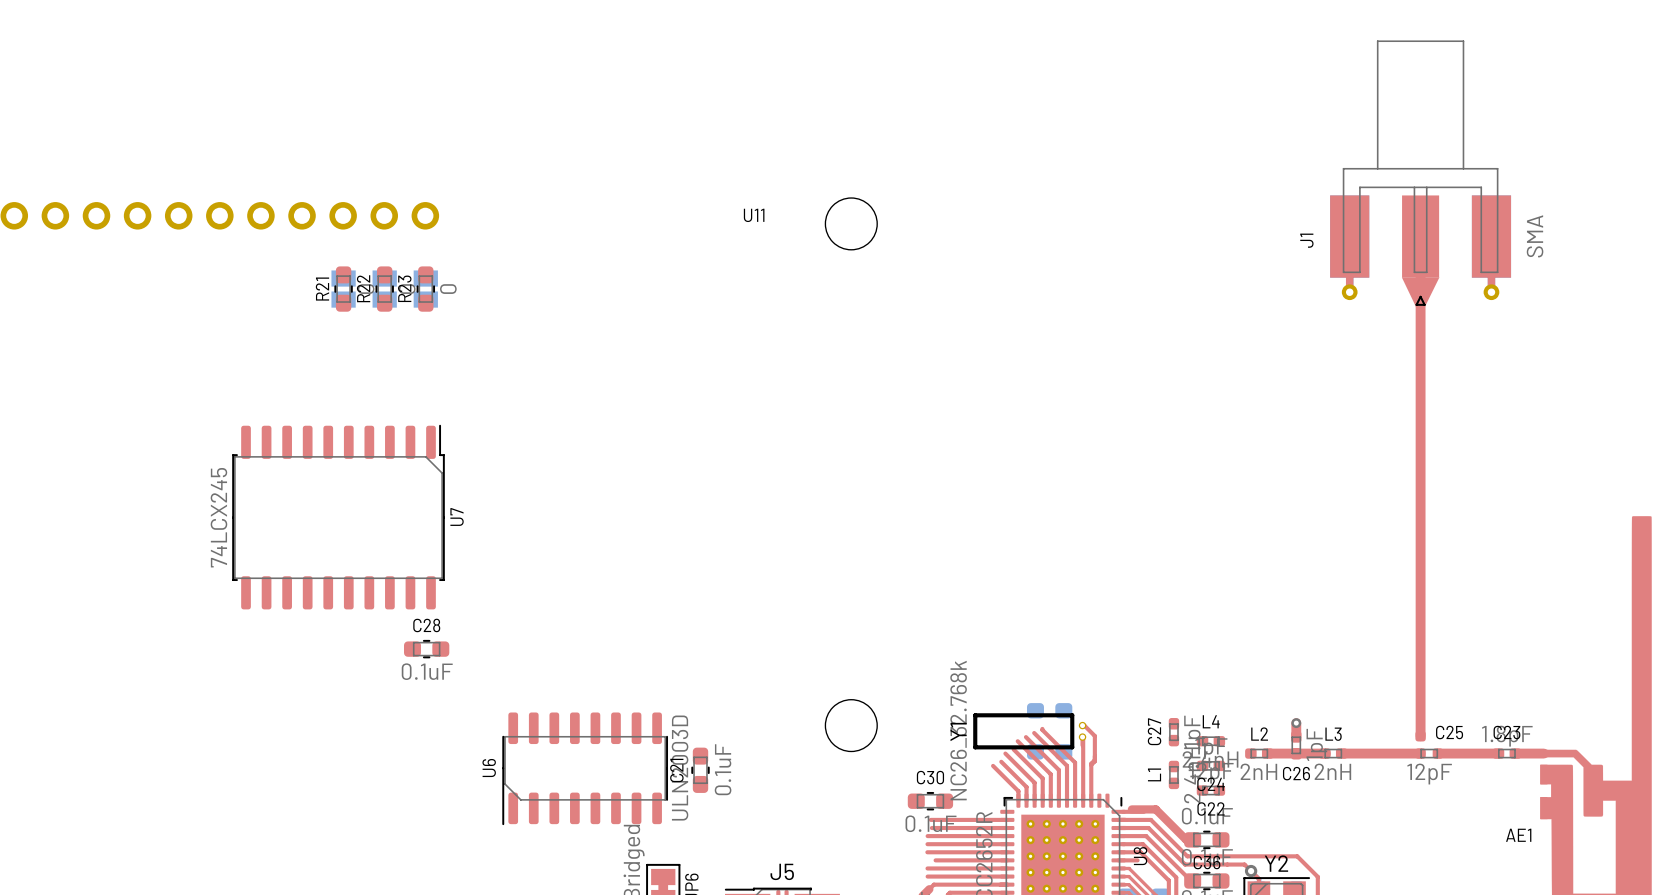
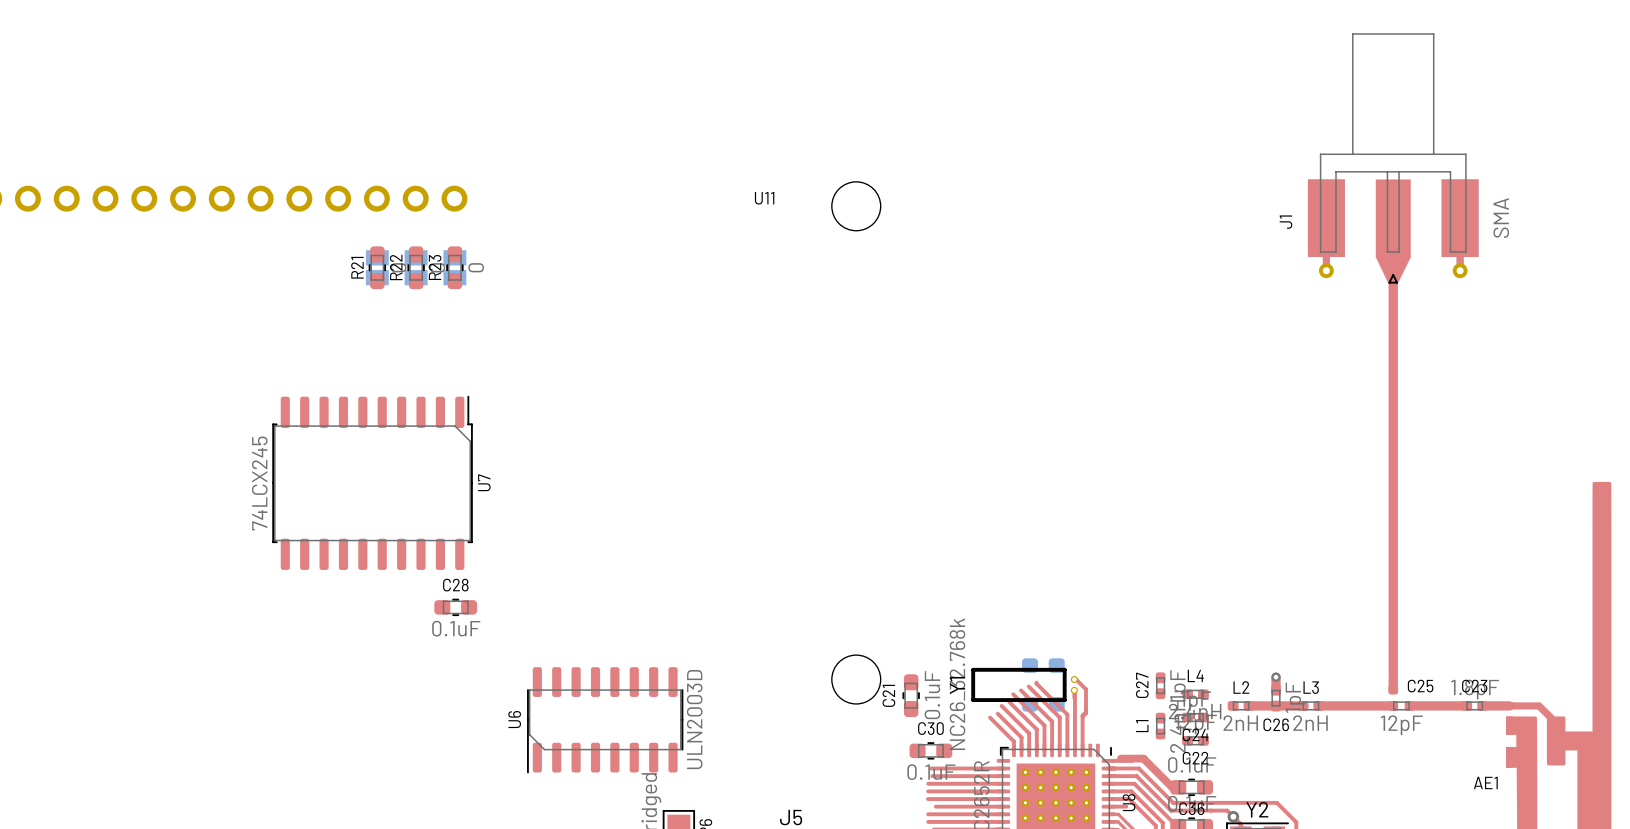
C21 position: (700, 770) -> (911, 695)

